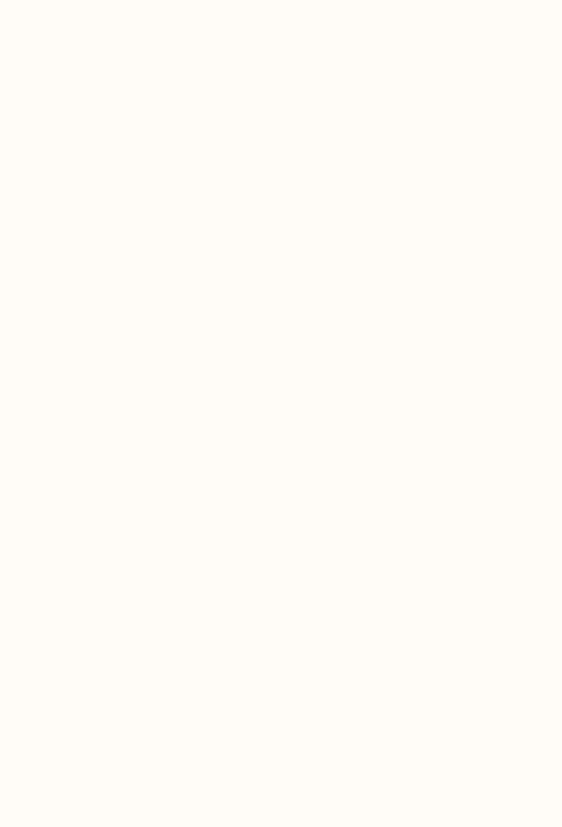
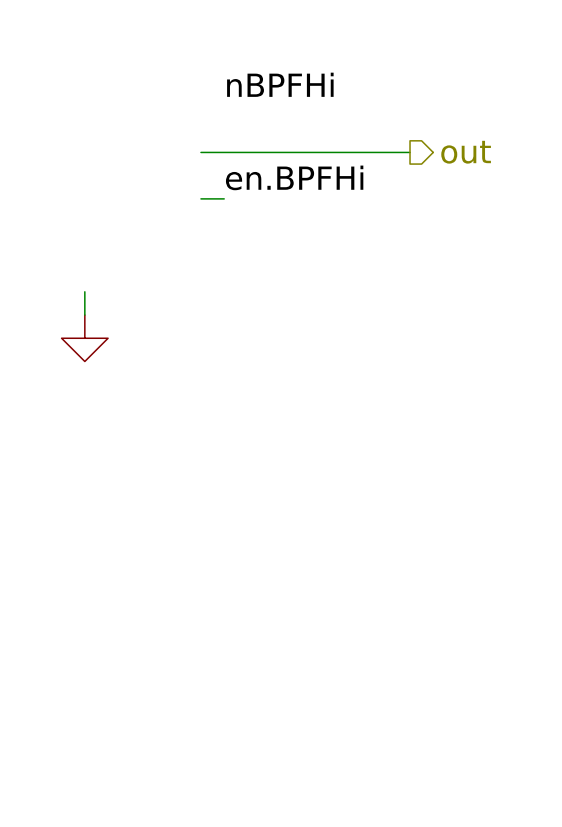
label: none -> nBPFHi (280, 84)
hierarchical label: none -> out (466, 152)
wire: none -> (200, 152) (410, 152)
label: none -> en.BPFHi (294, 177)
wire: none -> (200, 198) (224, 198)
wire: none -> (84, 291) (84, 315)
power symbol: none -> (84, 338)

